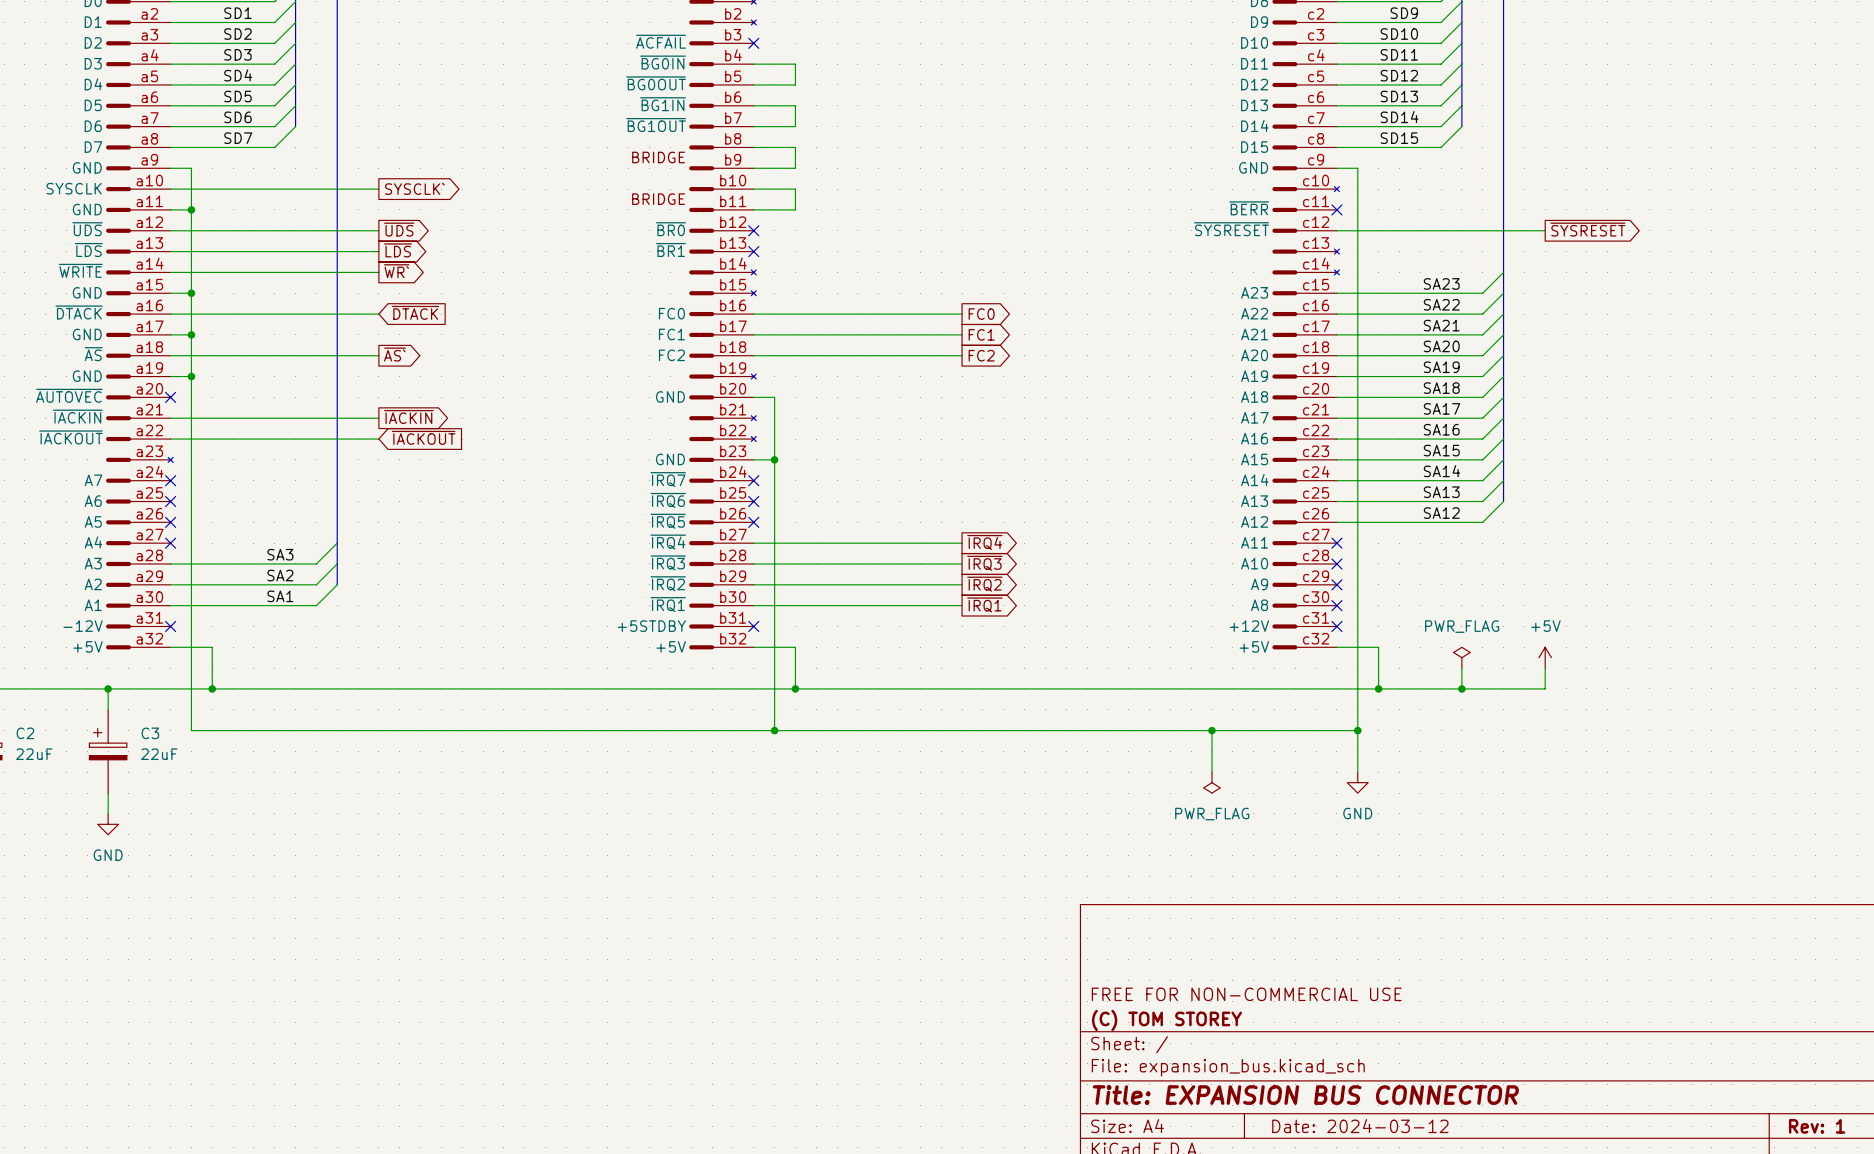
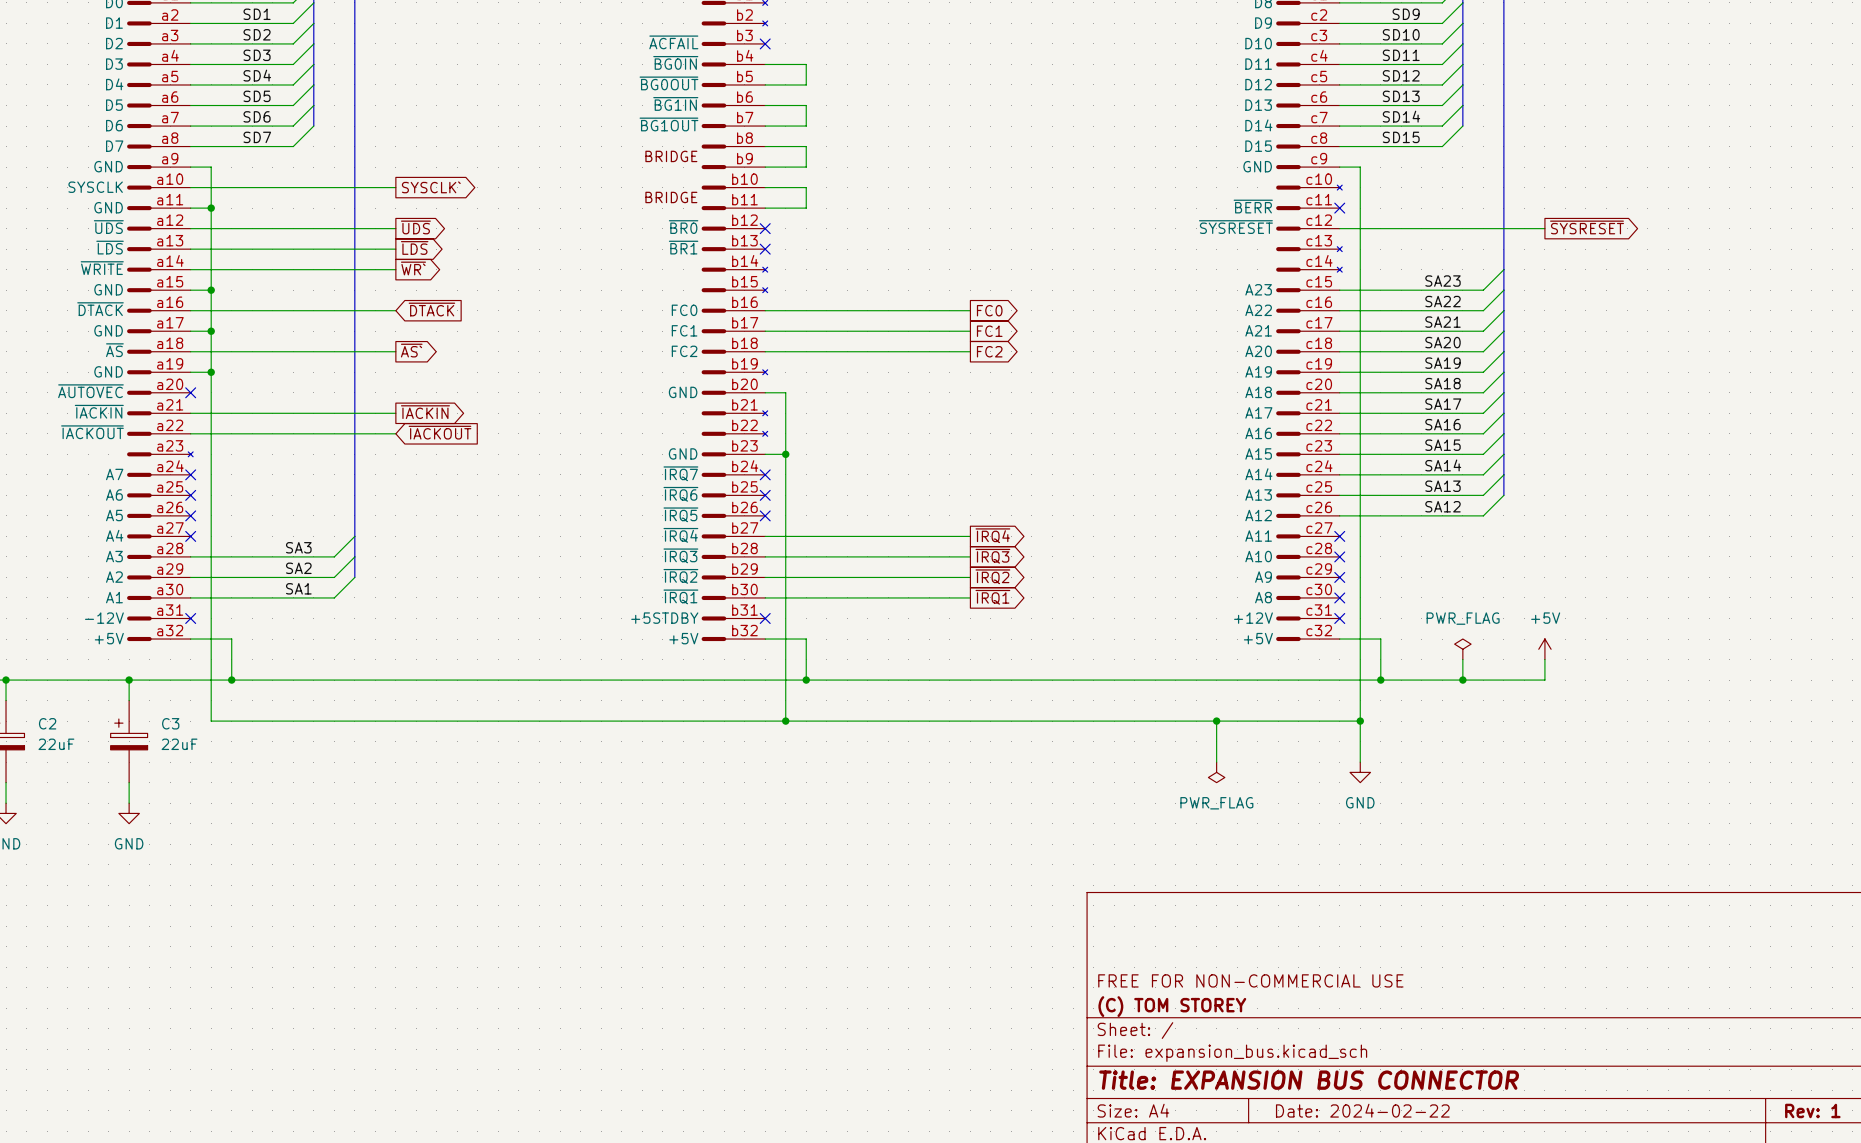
title block: Date: 2024-03-12 (1360, 1126) -> Date: 2024-02-22 (1362, 1110)

